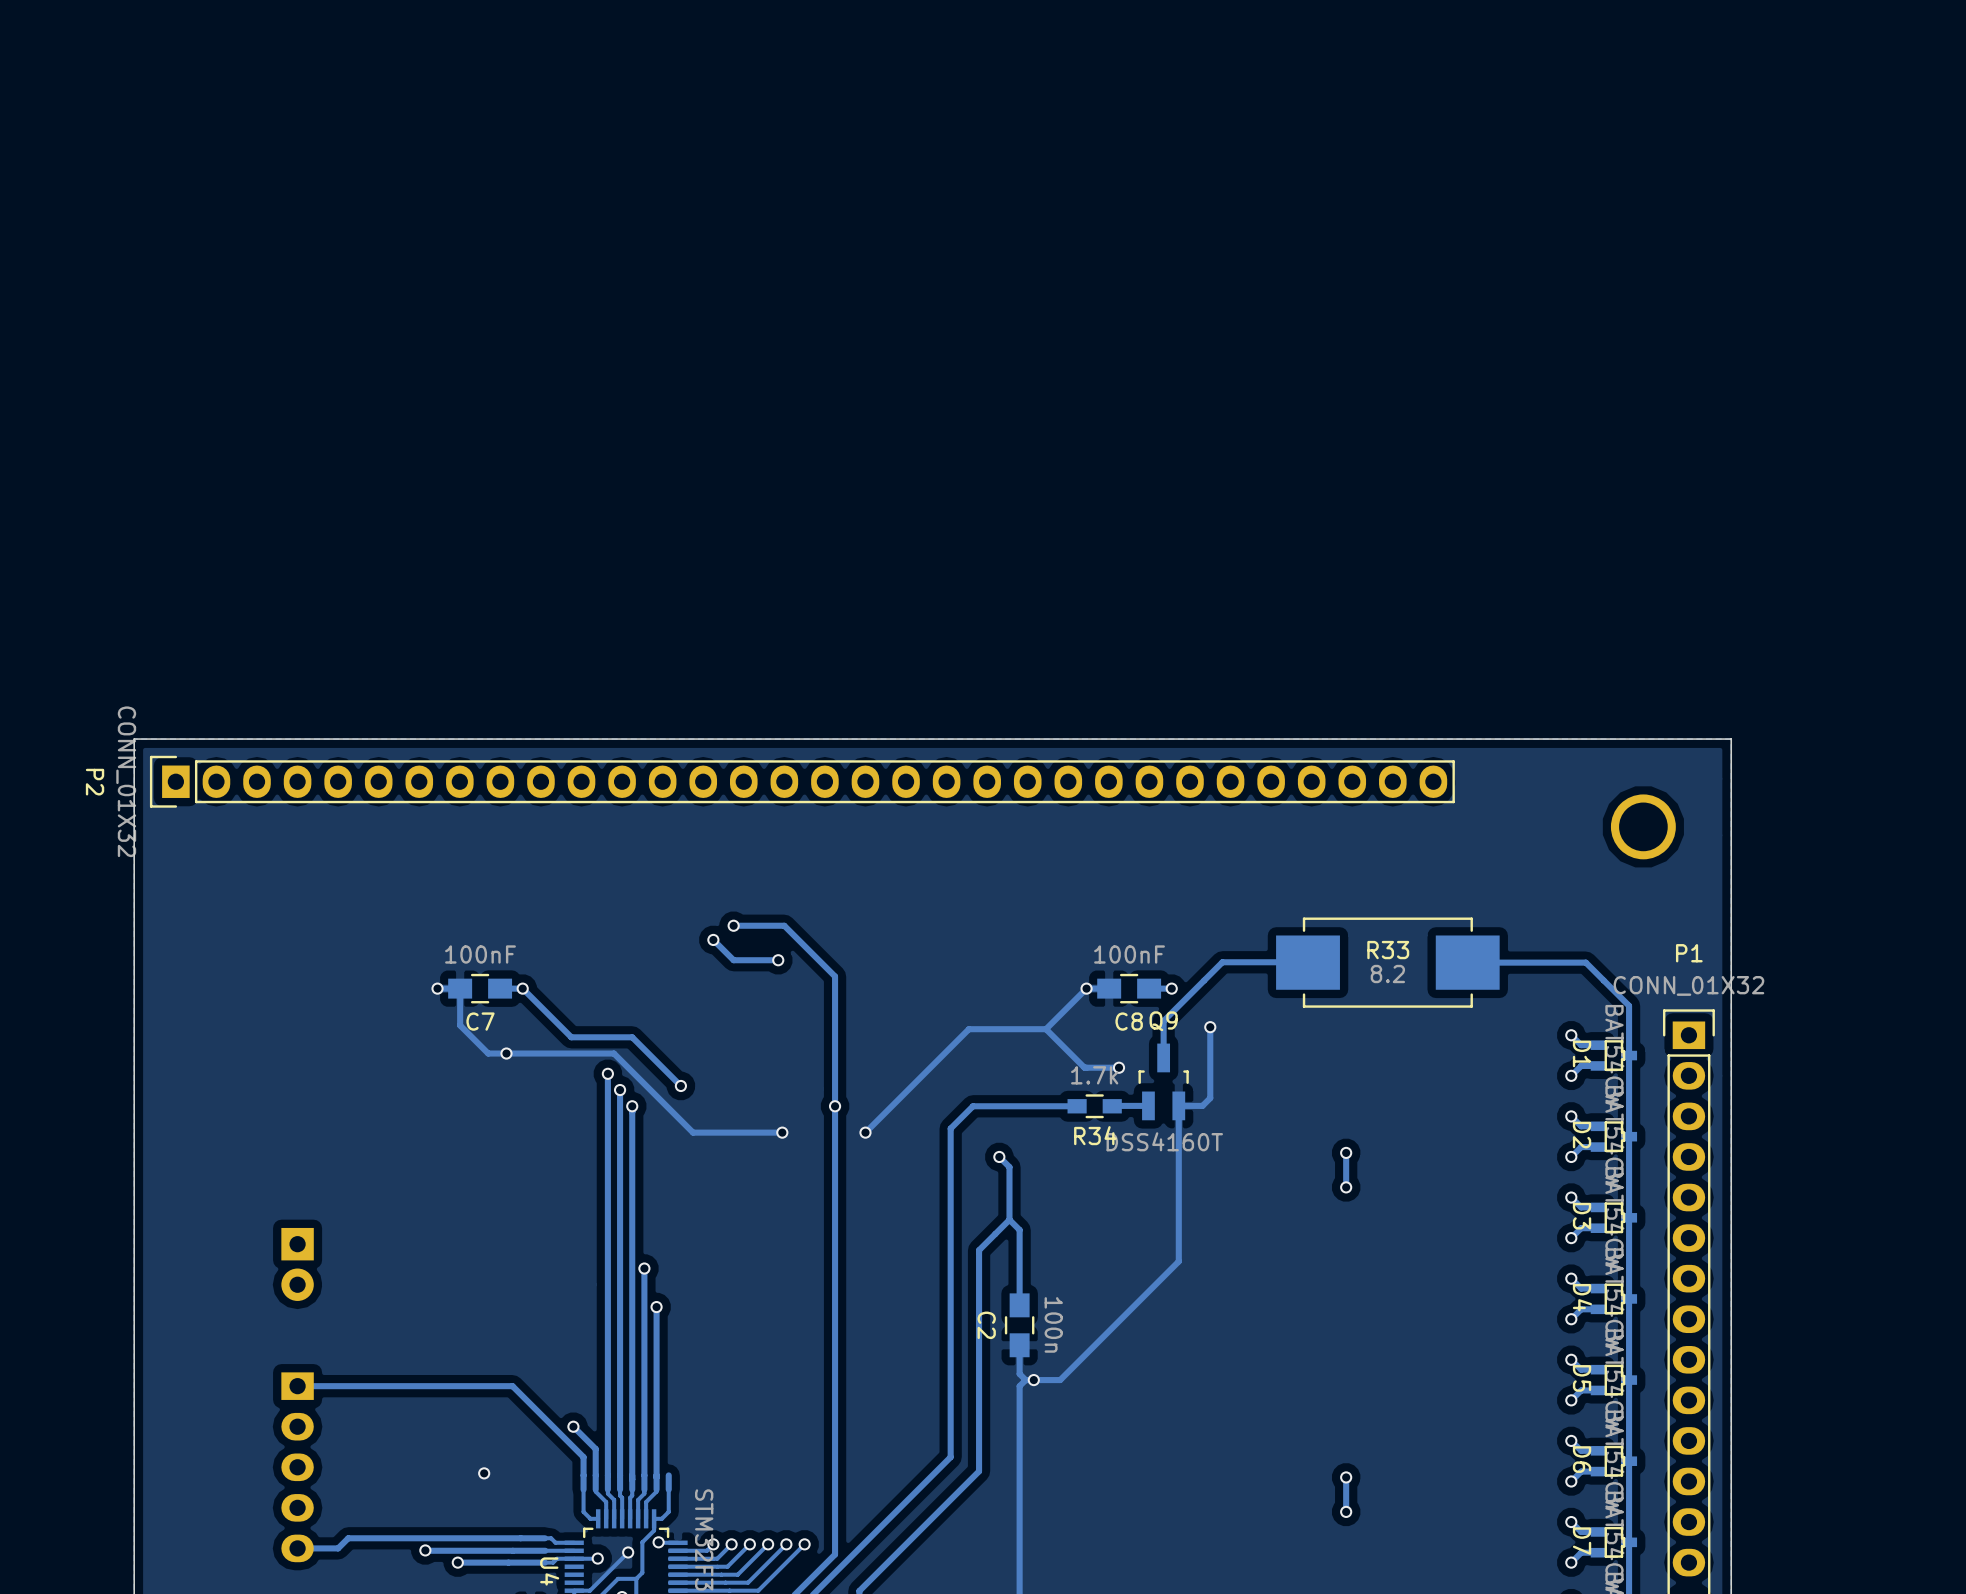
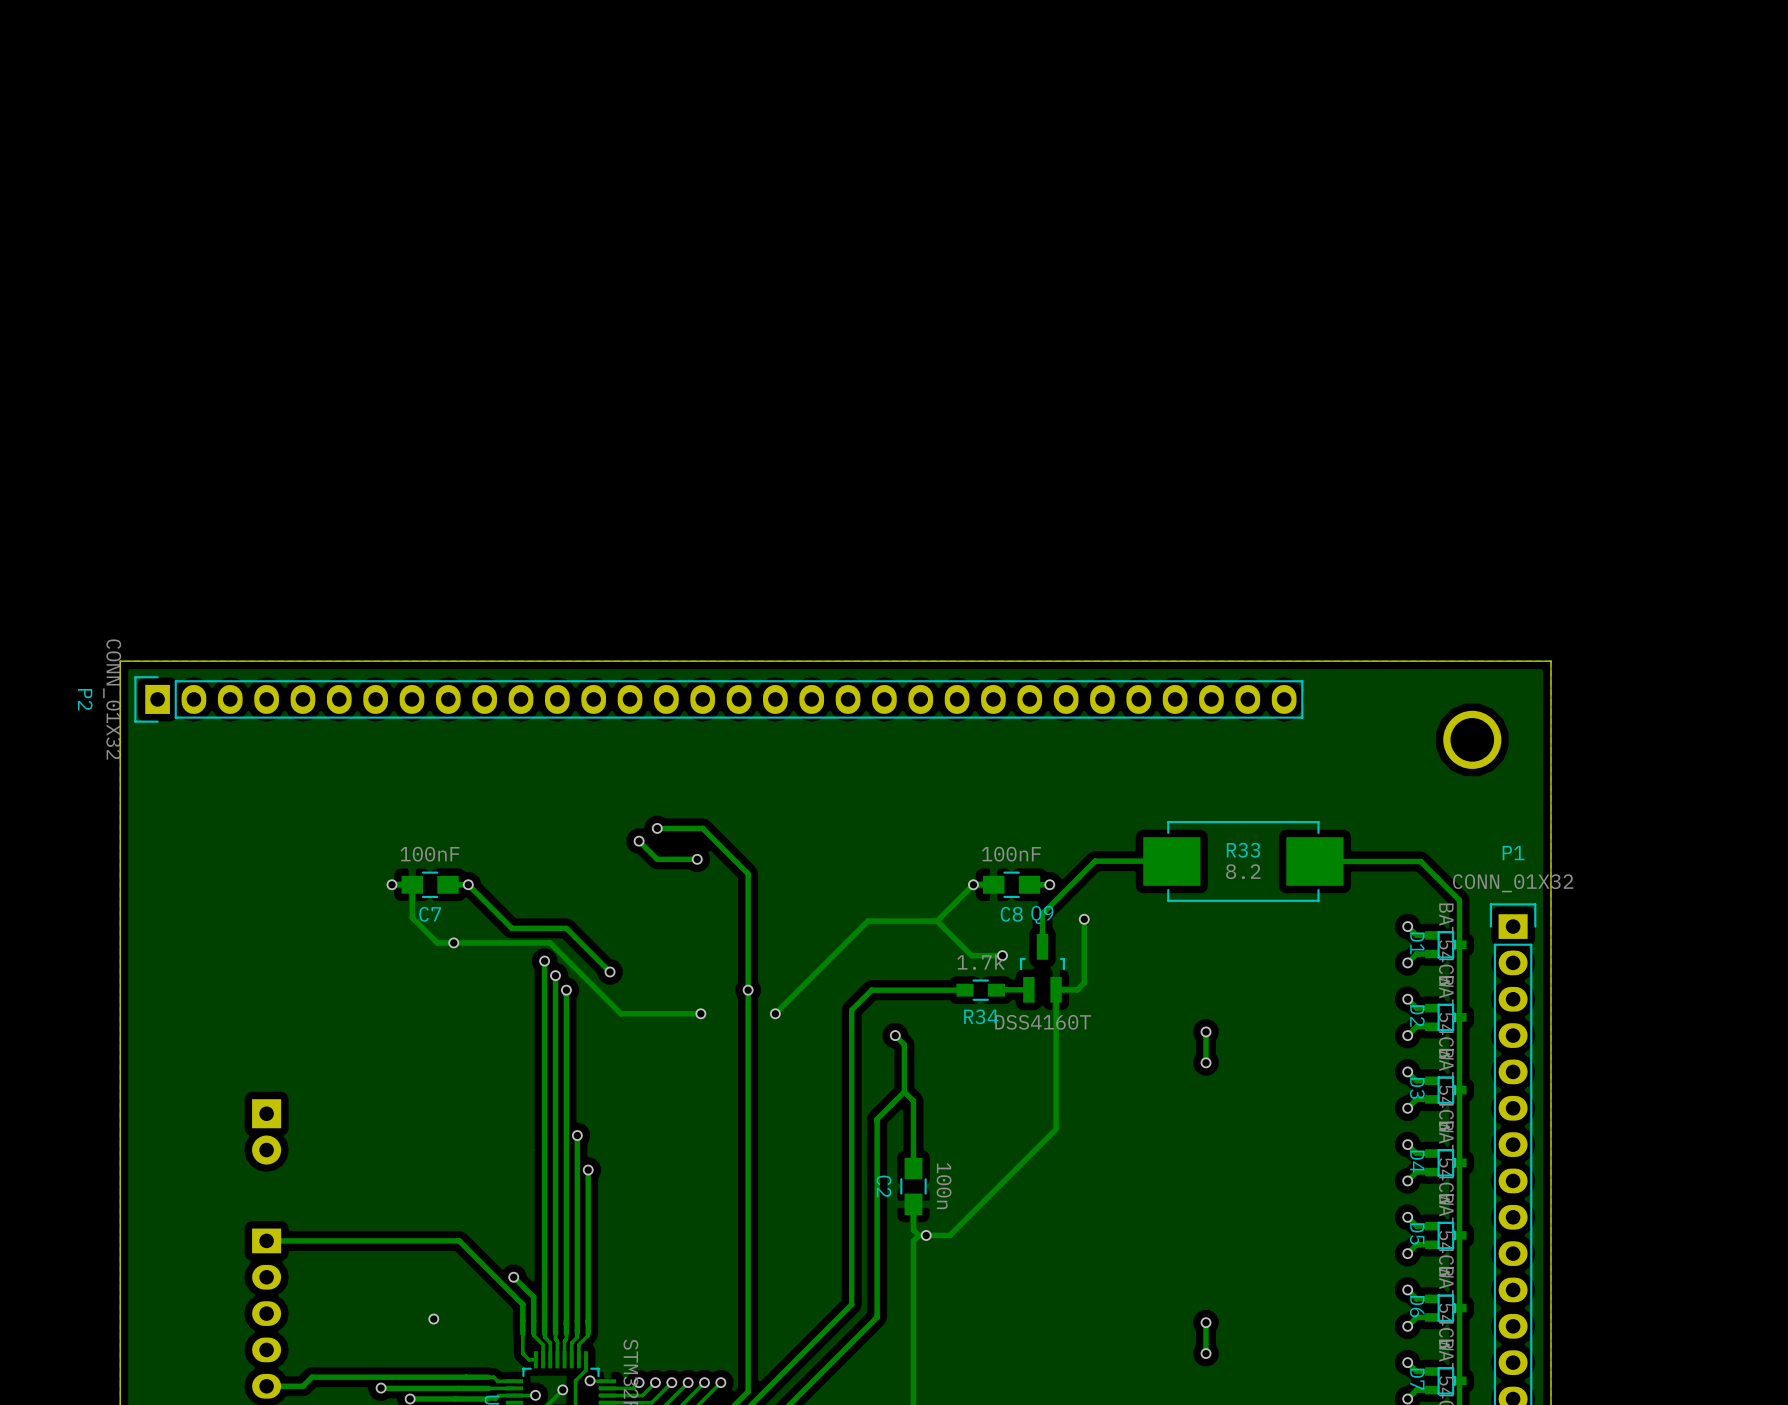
track: (668, 1475) (668, 1511) (661, 1518) (654, 1518) -> none

